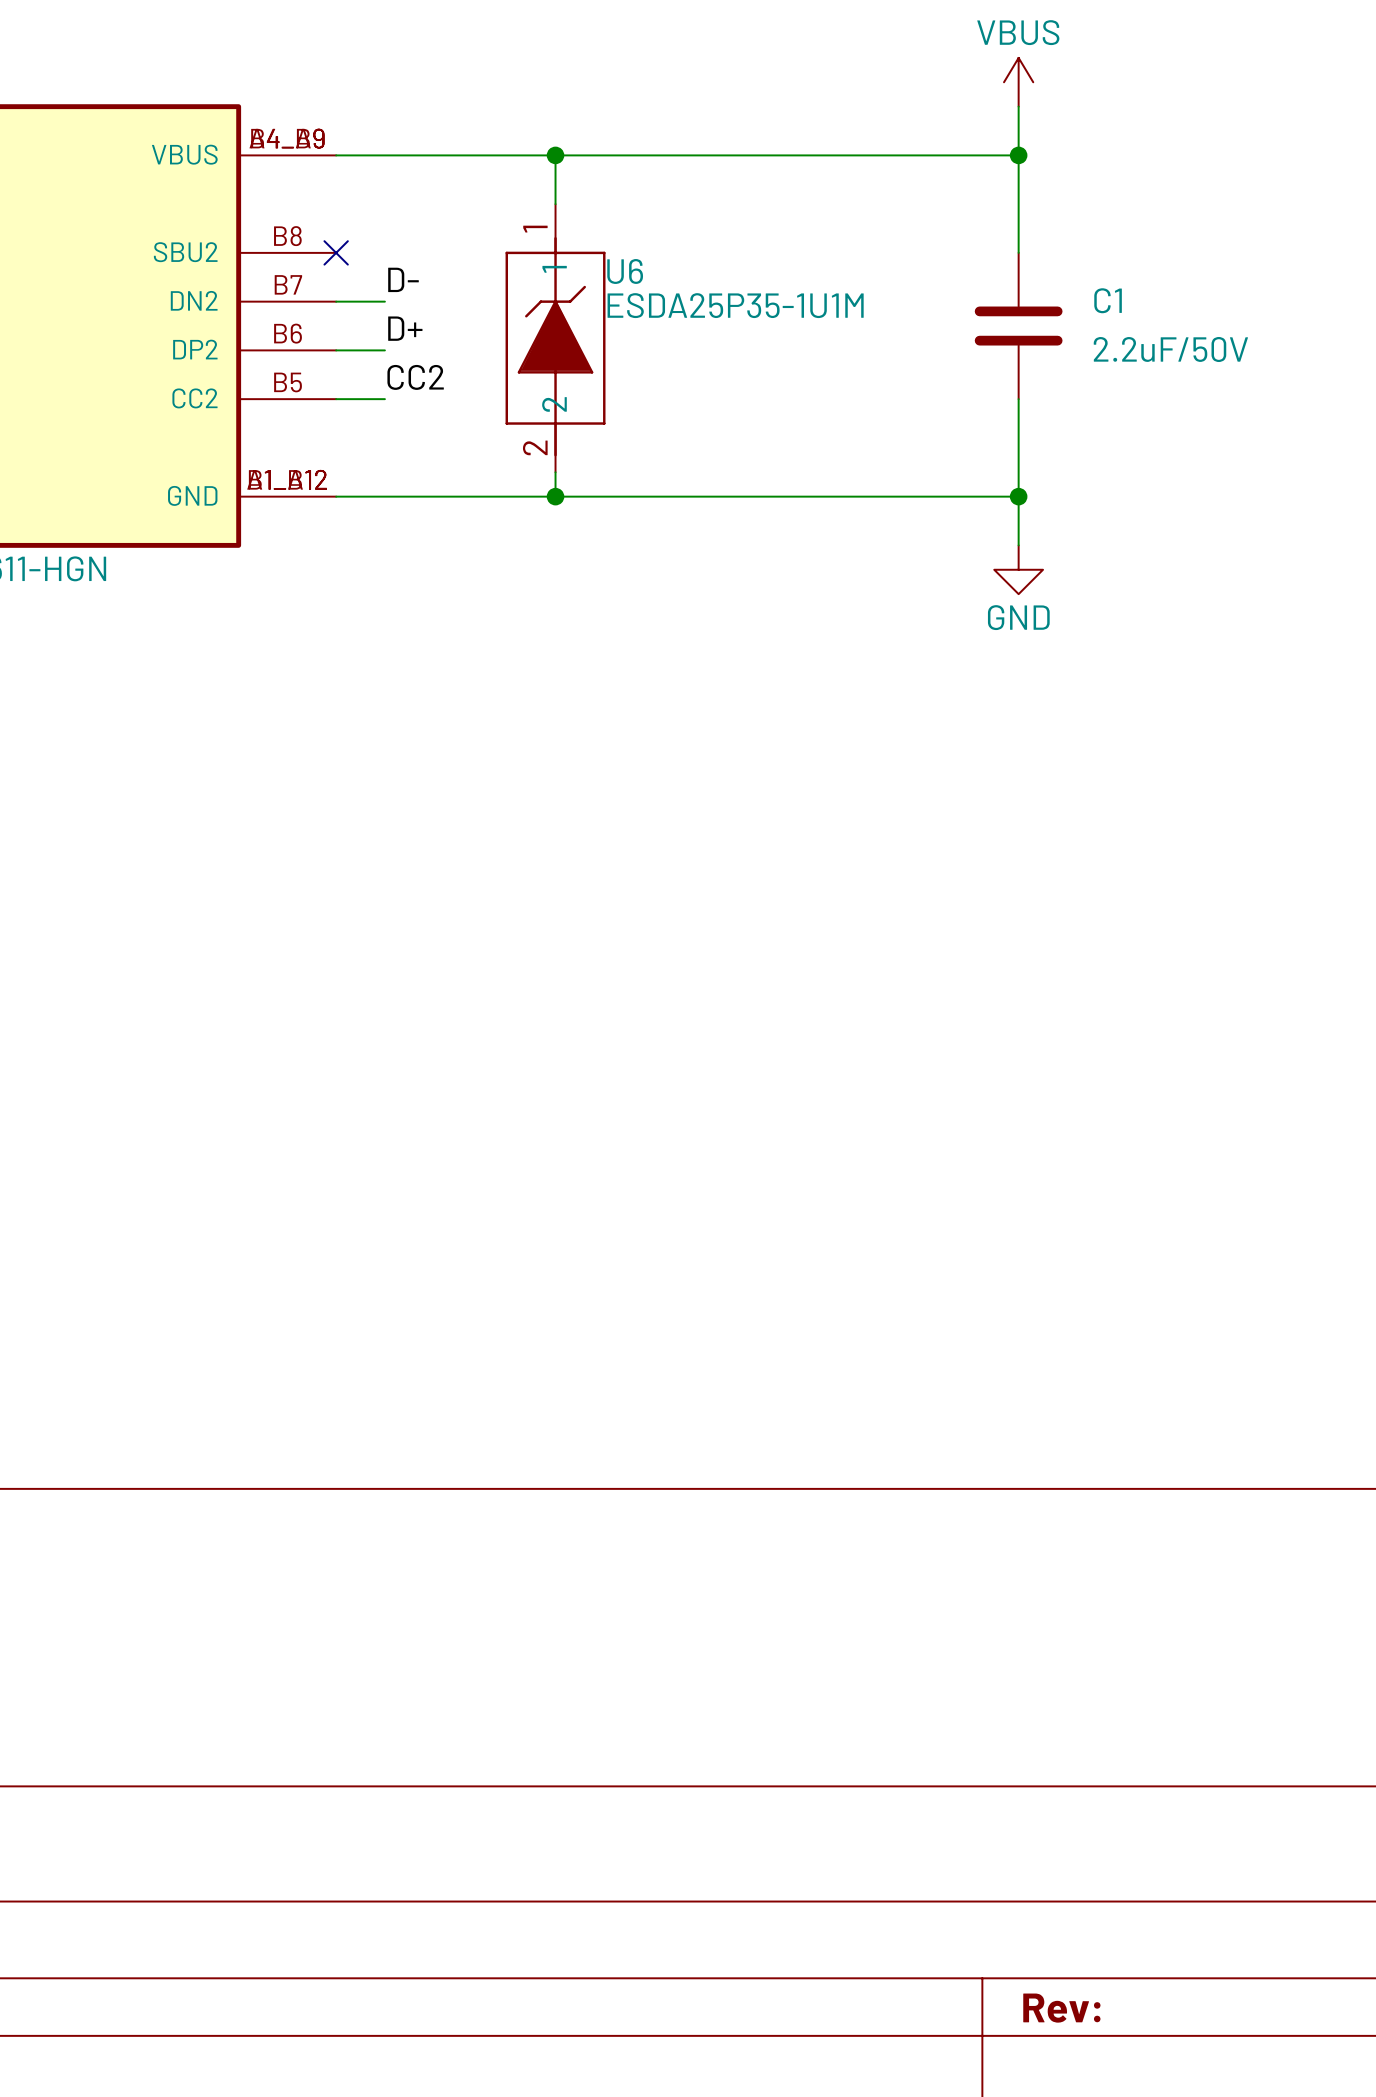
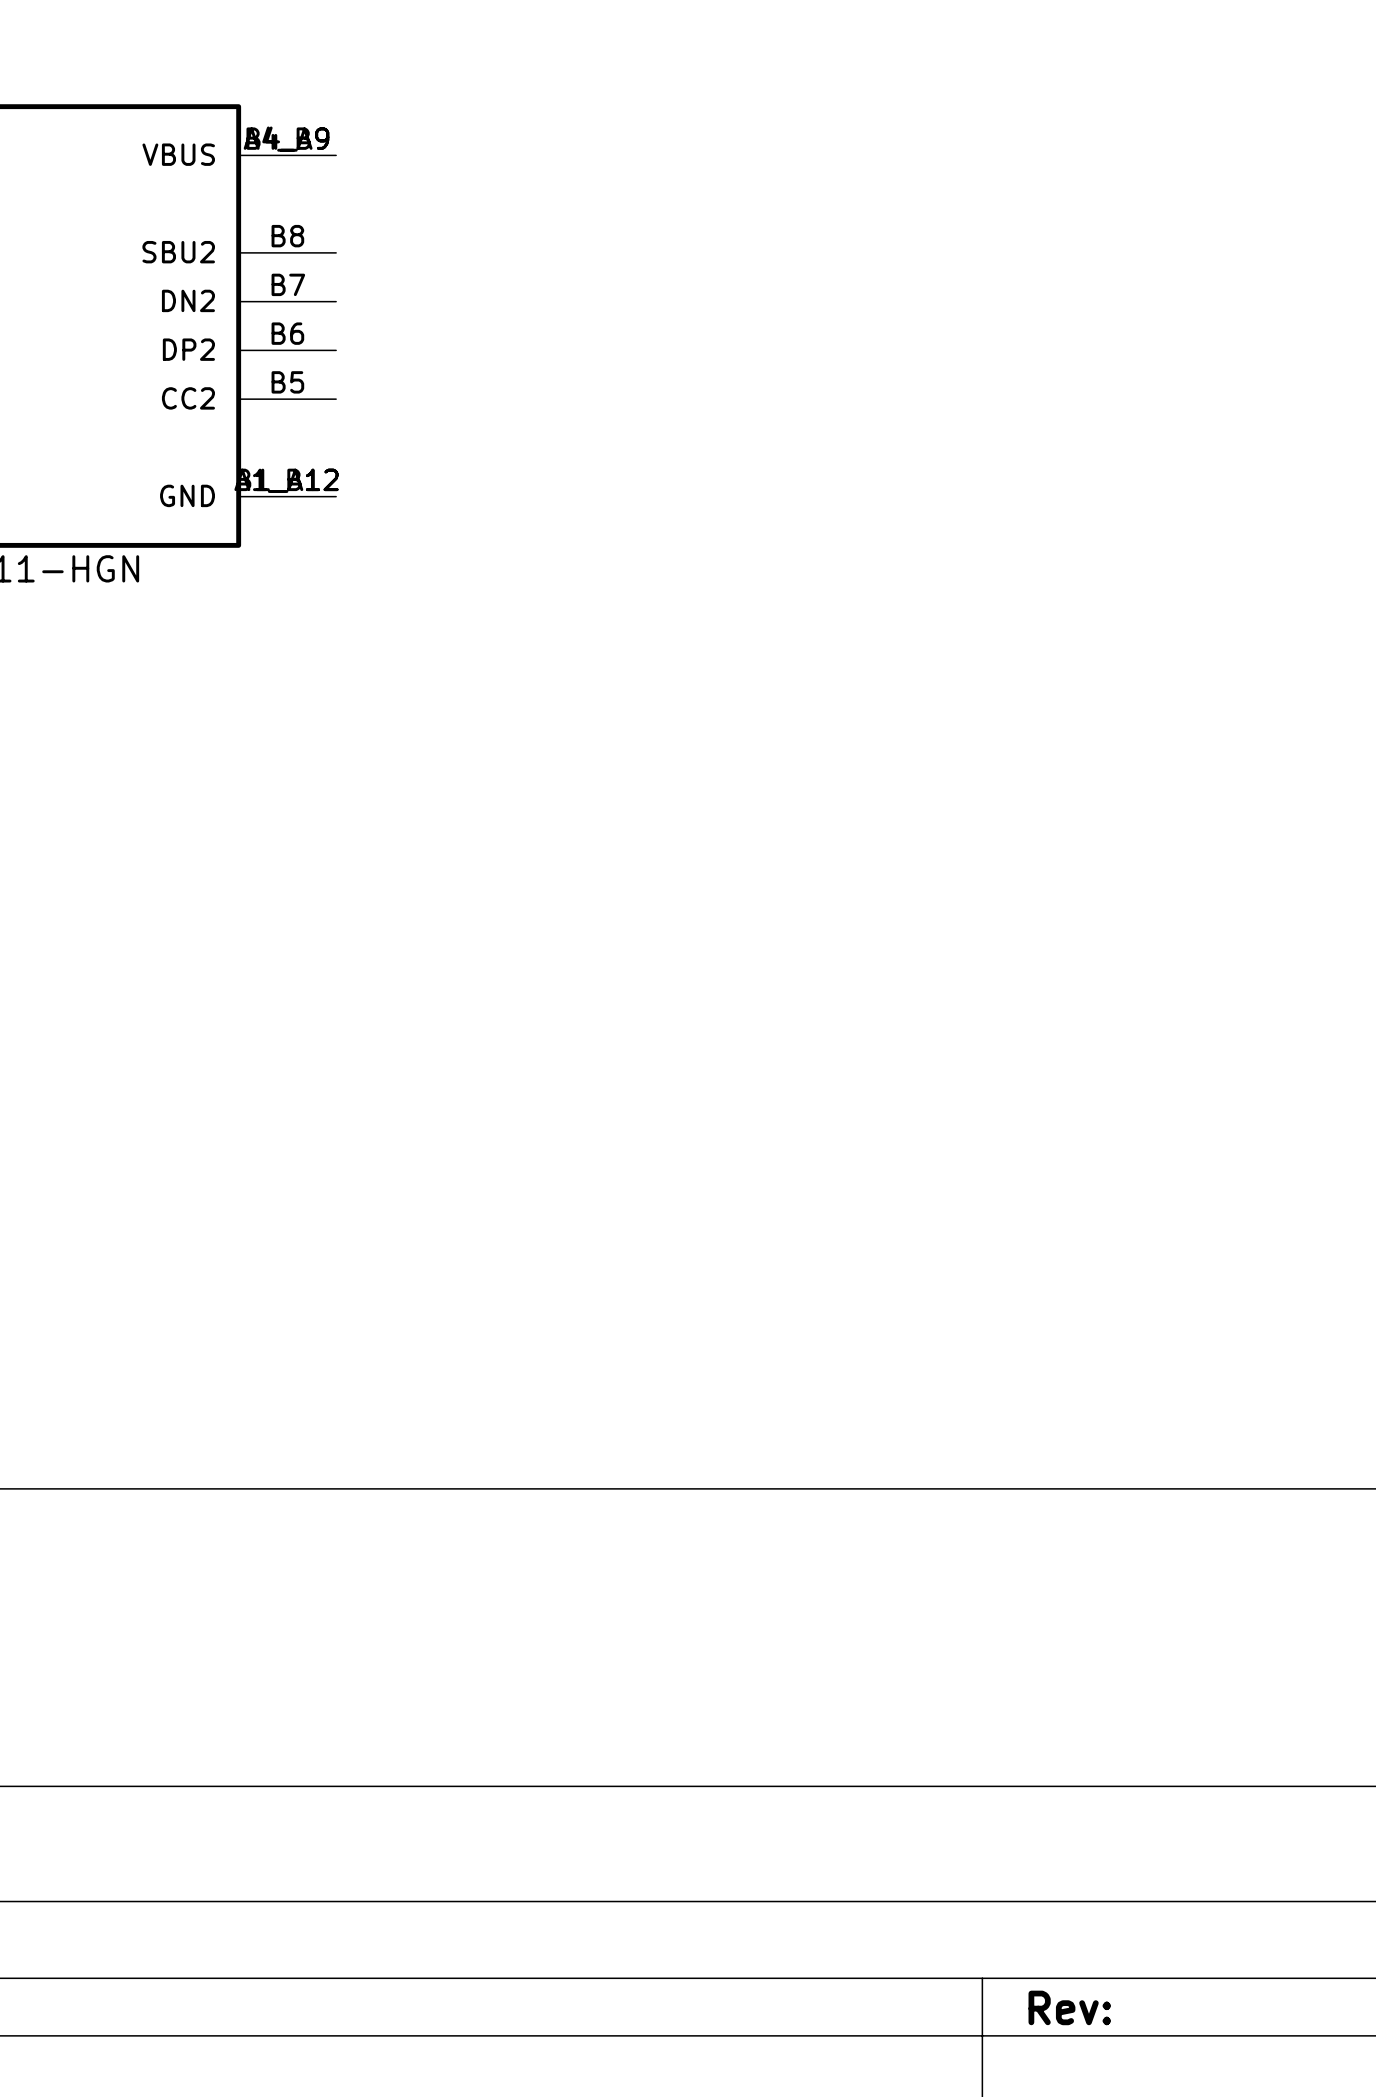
power symbol: VBUS (1018, 82) -> none
wire: (1018, 106) (1018, 252) -> none
wire: (336, 155) (1018, 155) -> none
wire: (555, 155) (555, 204) -> none
junction: (555, 155) -> none
junction: (1018, 155) -> none
no-connect mark: (336, 252) -> none
label: D- (403, 279) -> none
wire: (336, 301) (384, 301) -> none
C1: 2.2uF/50V (1018, 326) -> none
label: D+ (405, 328) -> none
U6: ESDA25P35-1U1M (555, 338) -> none
wire: (336, 350) (384, 350) -> none
label: CC2 (415, 377) -> none
wire: (336, 399) (384, 399) -> none
wire: (1018, 399) (1018, 545) -> none
wire: (555, 472) (555, 496) -> none
wire: (336, 496) (1018, 496) -> none
junction: (555, 496) -> none
junction: (1018, 496) -> none
power symbol: GND (1018, 569) -> none

